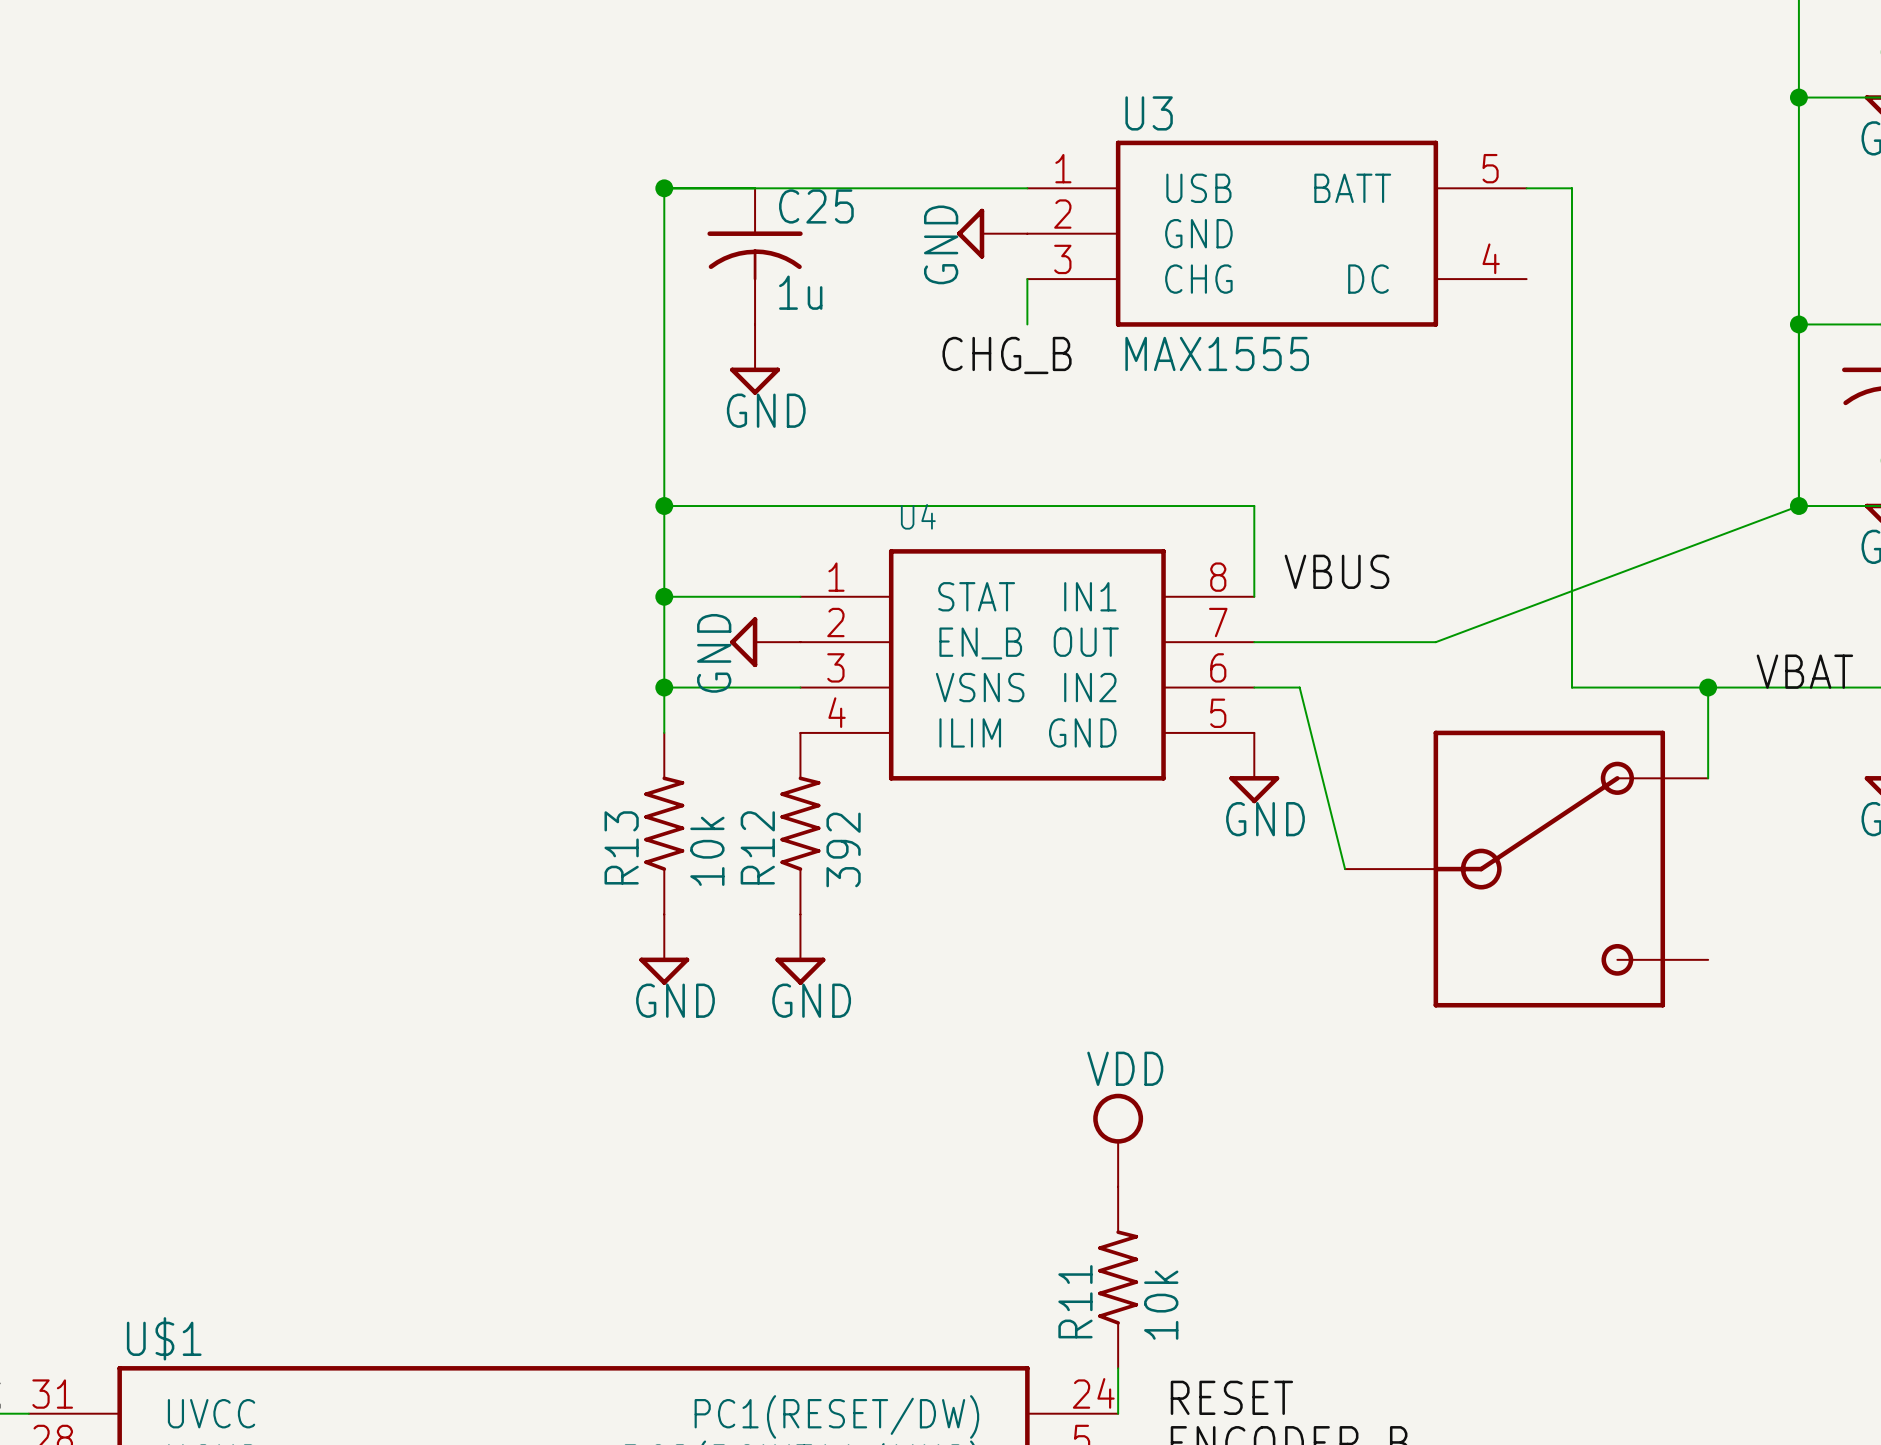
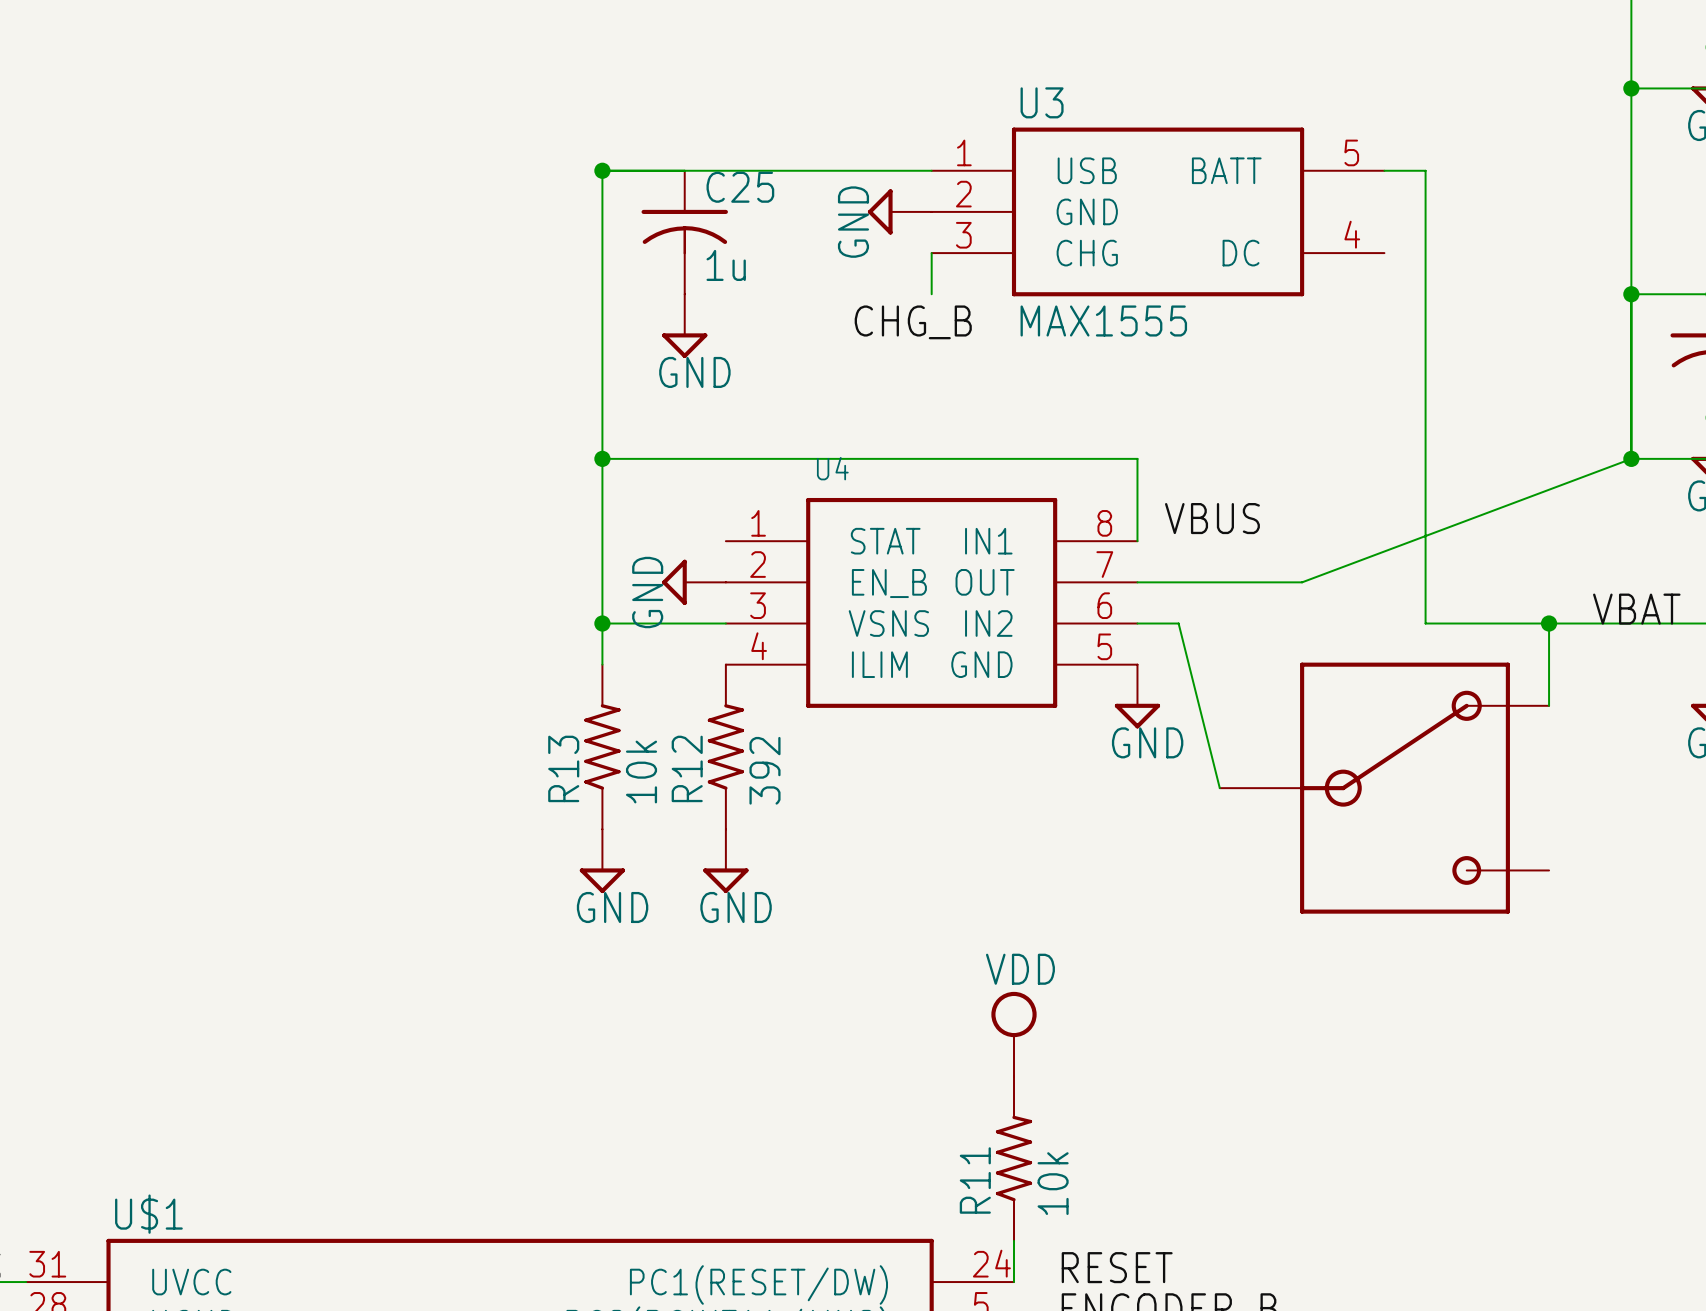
wire: (664, 596) (800, 596) -> none
junction: (664, 596) -> none

